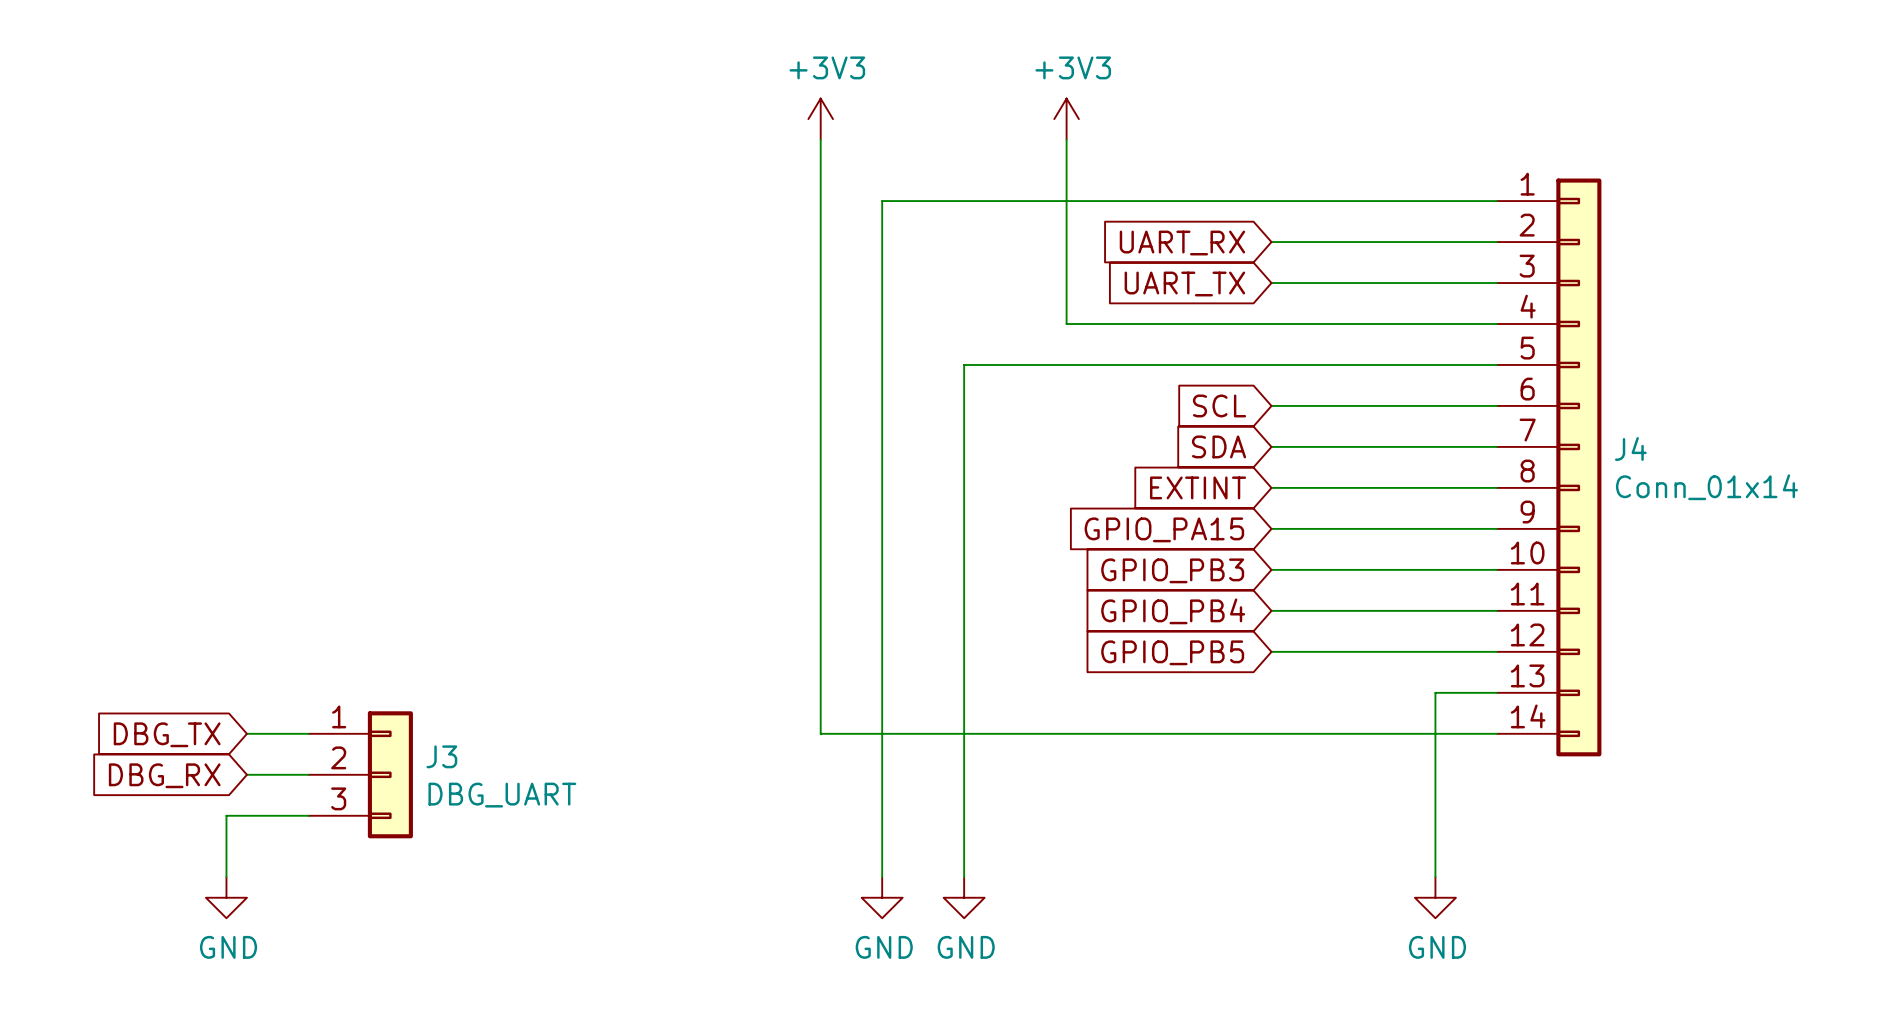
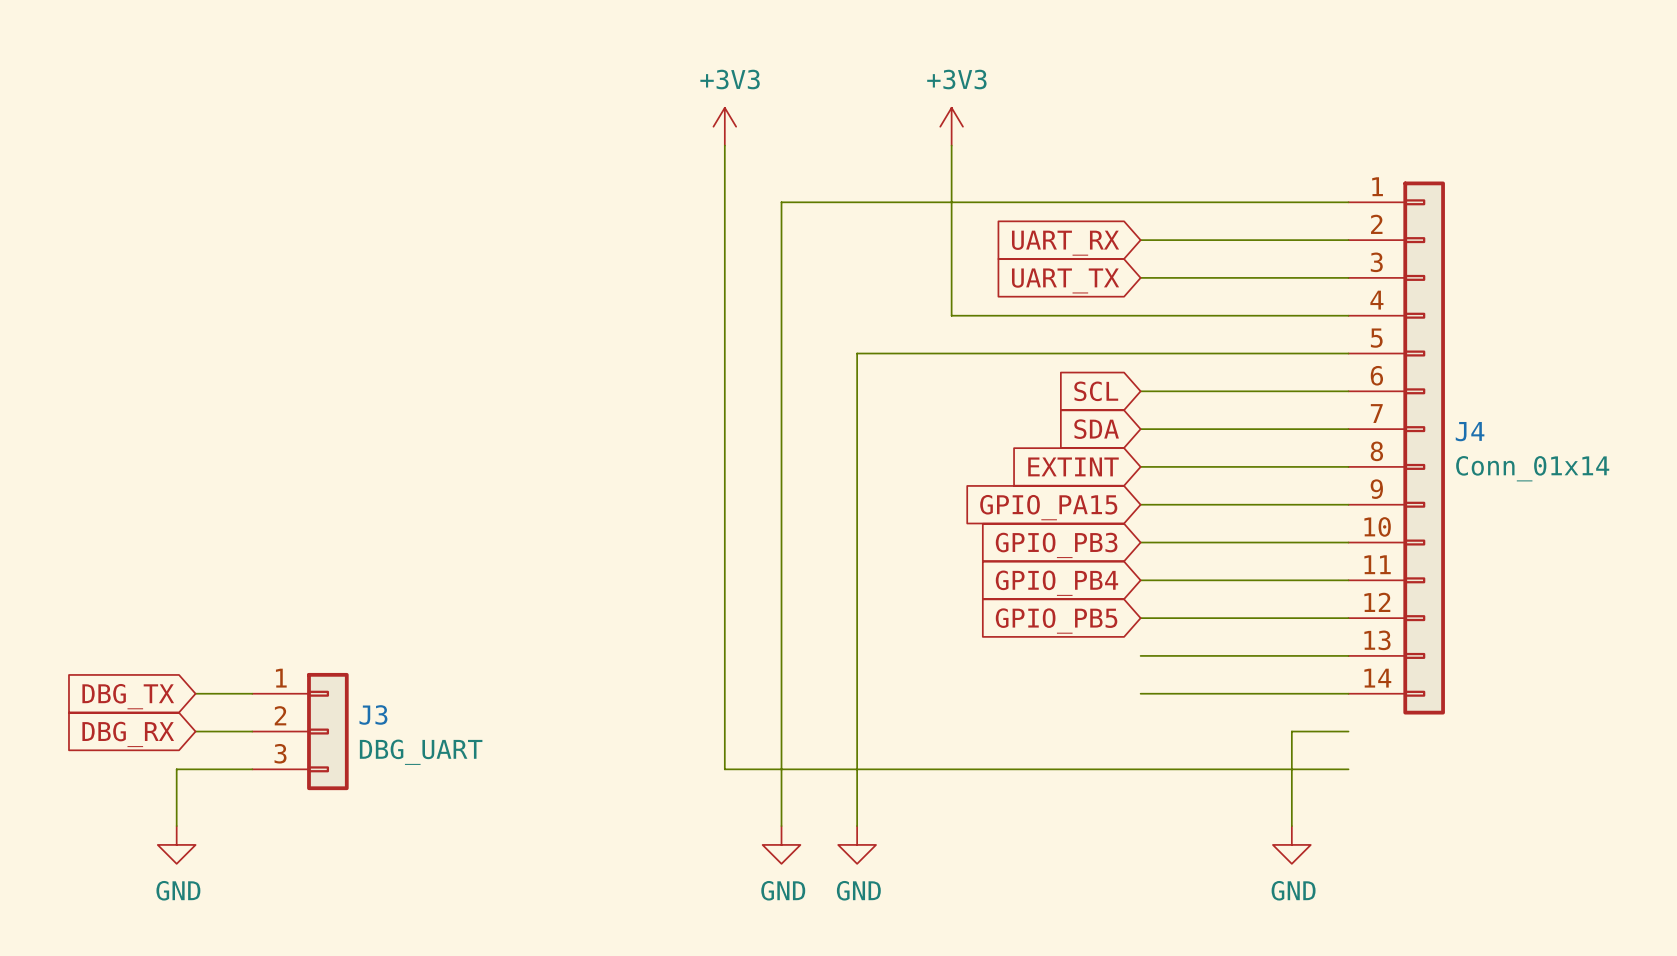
wire: none -> (1140, 655) (1291, 655)
wire: (1435, 692) (1435, 774) -> (1348, 731) (1291, 731)
wire: (820, 733) (1271, 733) -> (724, 693) (724, 769) (1348, 769)

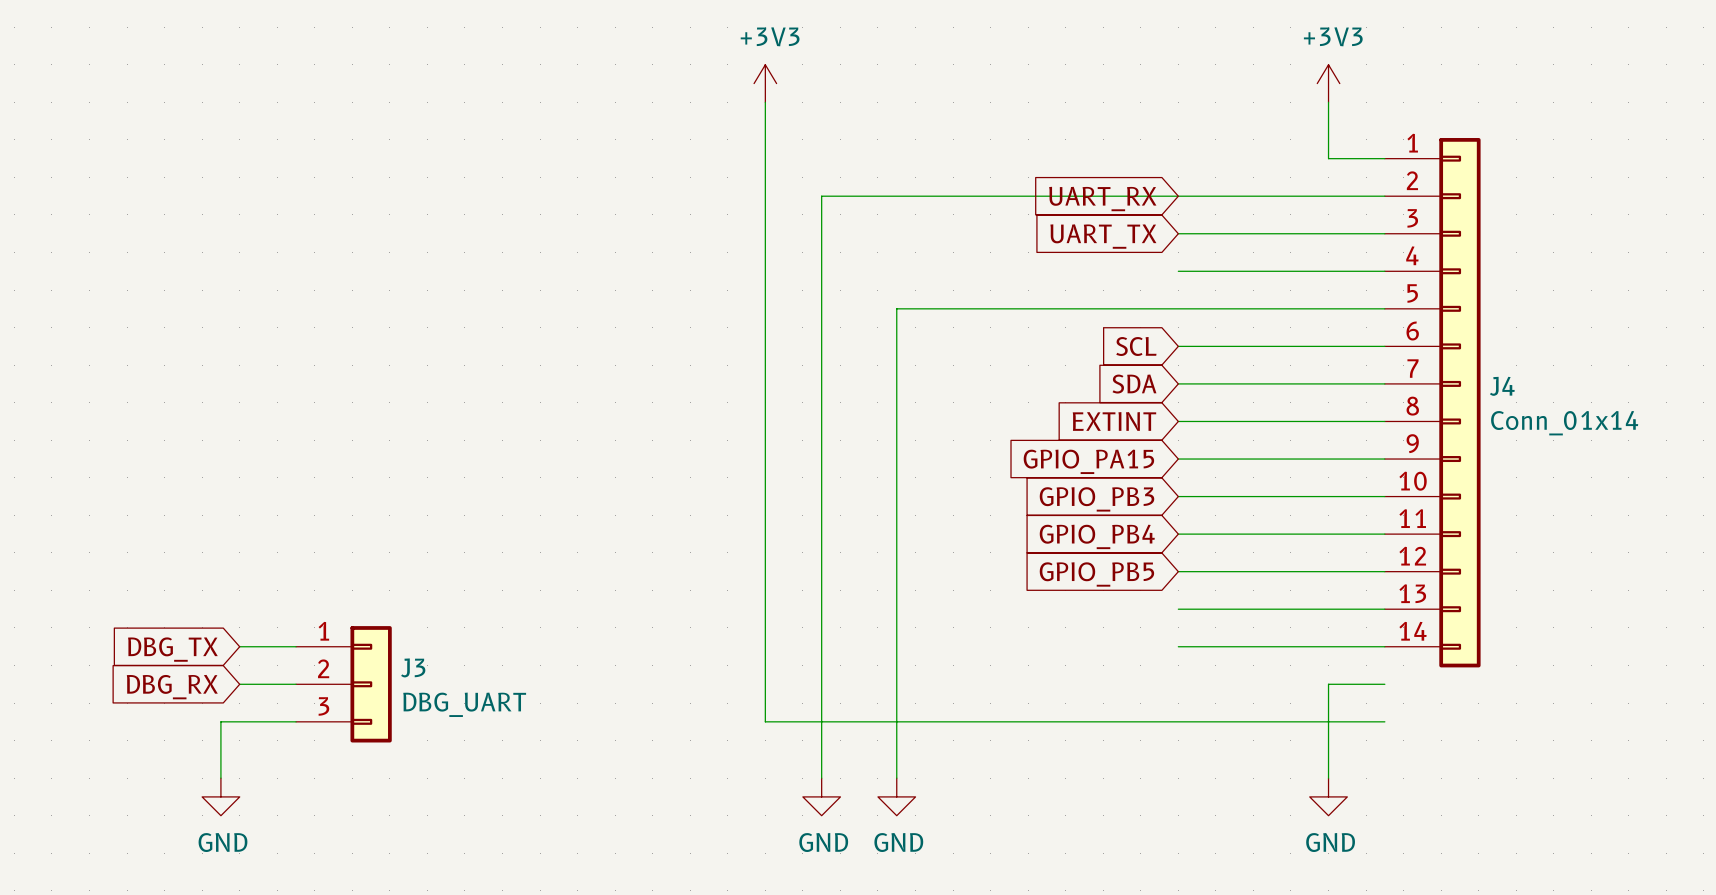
power symbol position: +3V3 (951, 126) -> +3V3 (1328, 83)
wire: (951, 145) (951, 315) (1140, 315) -> none
wire: none -> (1328, 102) (1328, 158)
wire: (1291, 202) (781, 202) (781, 240) -> (1178, 196) (821, 196)

